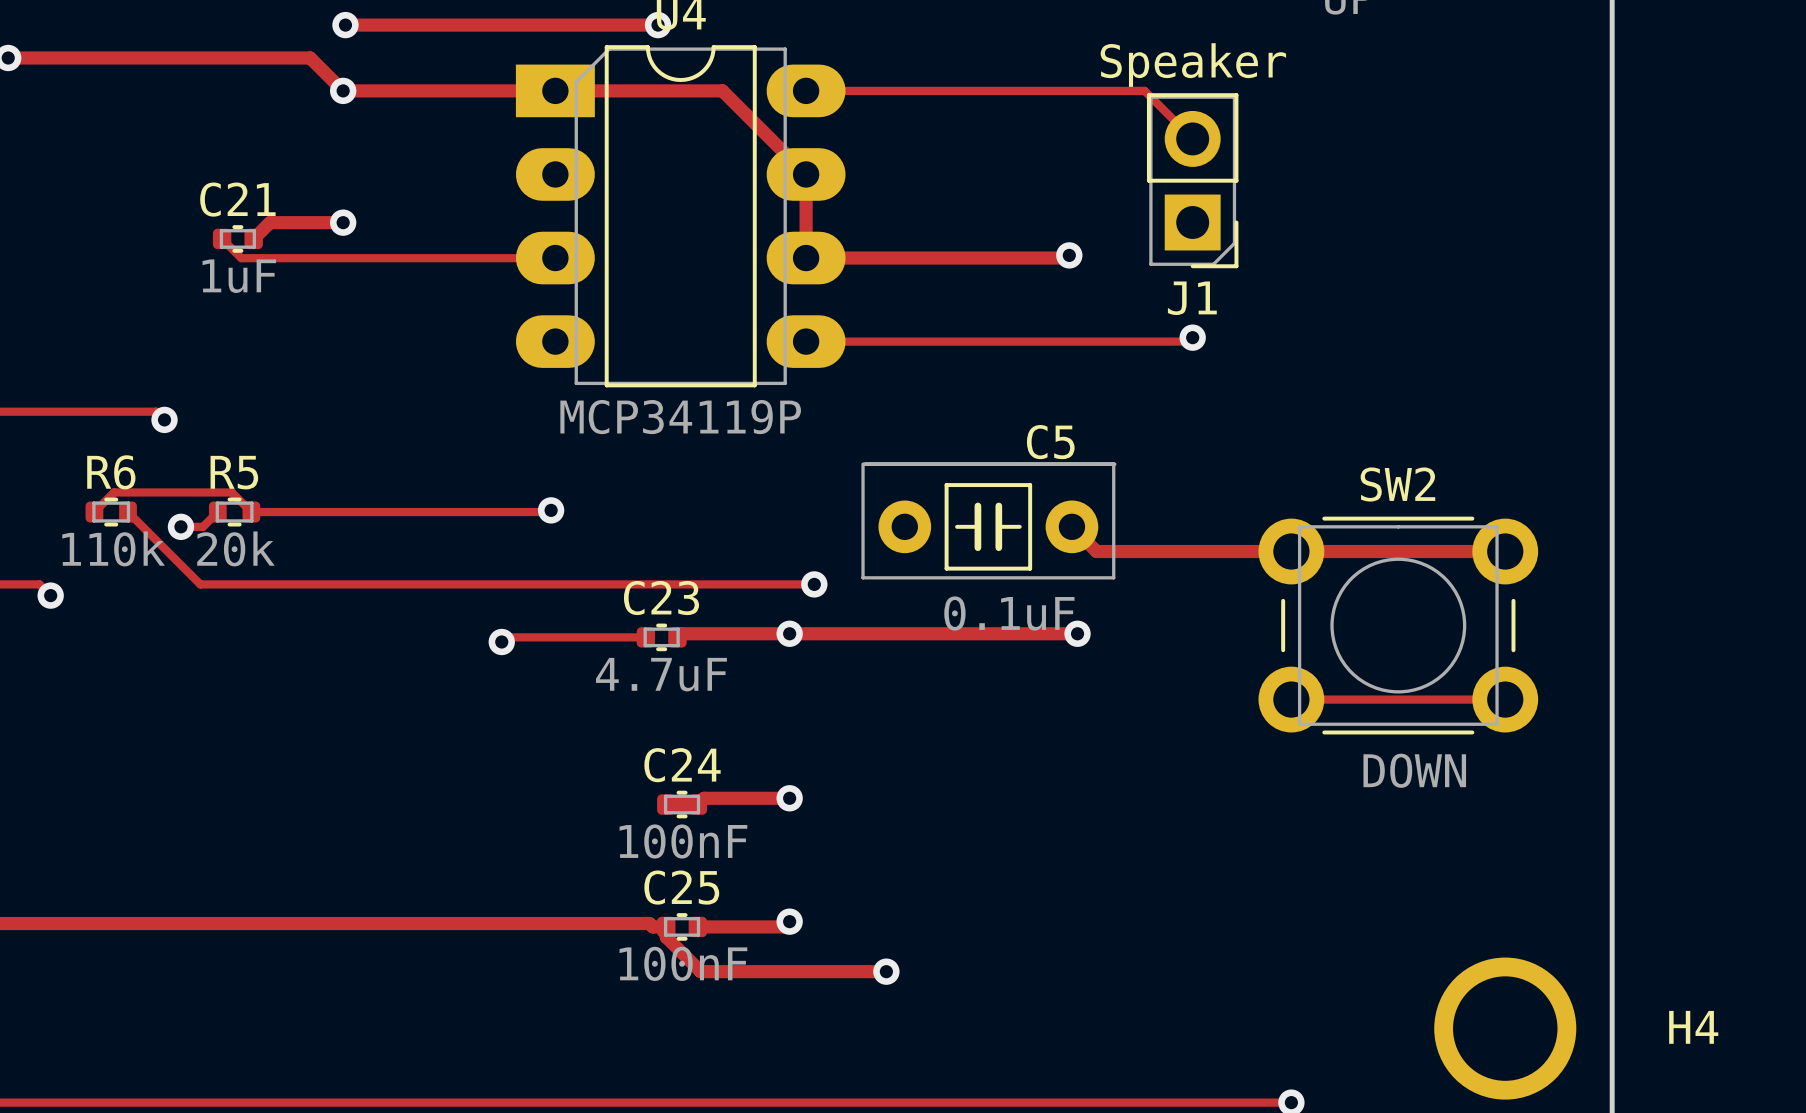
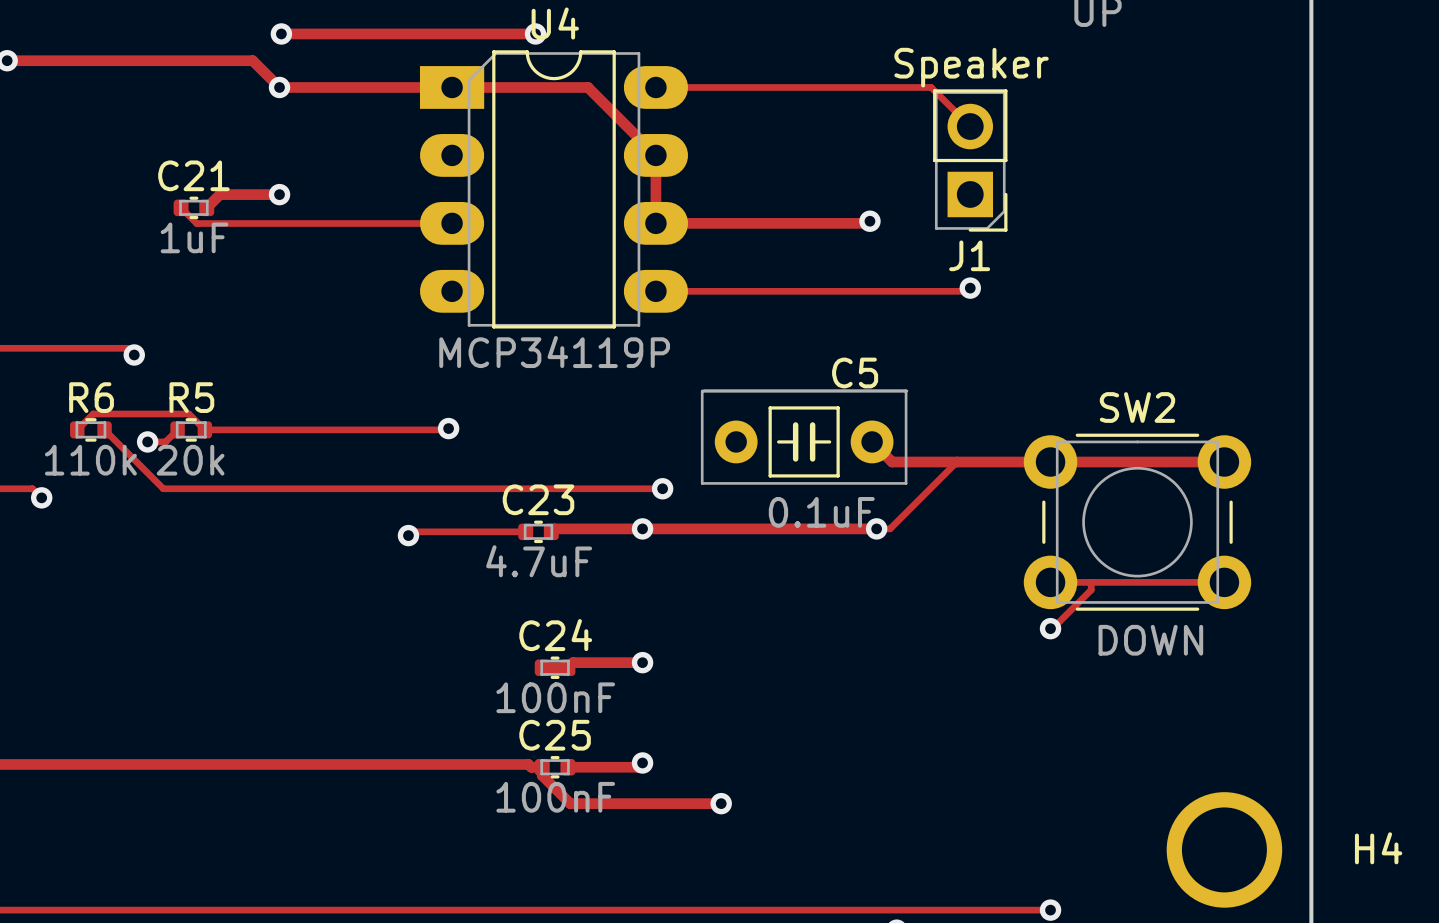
track: none -> (956, 462) (890, 528) (876, 528)
track: none -> (1091, 582) (1091, 590) (1050, 628)
via: none -> (1050, 628)

